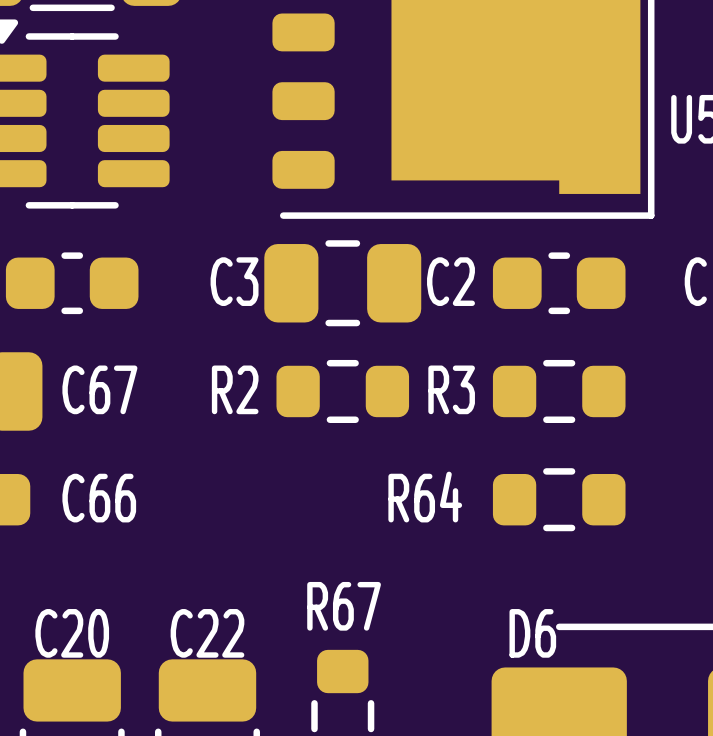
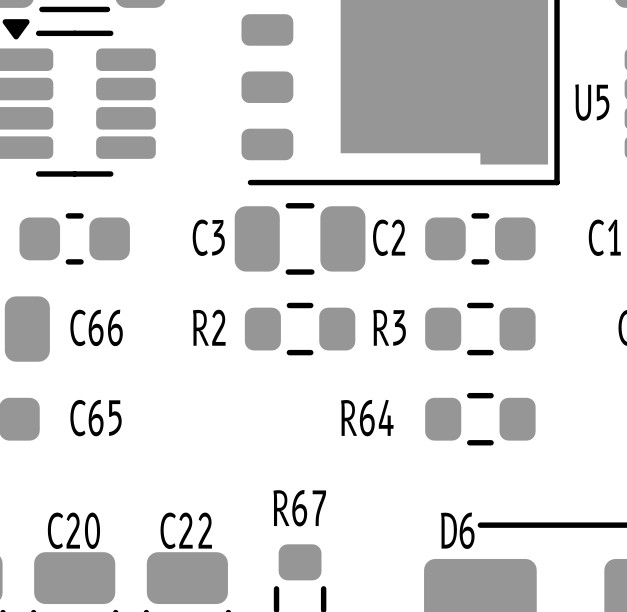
C67 name: C67 (99, 389) -> C66 (96, 327)
C66 name: C66 (99, 498) -> C65 (96, 418)

